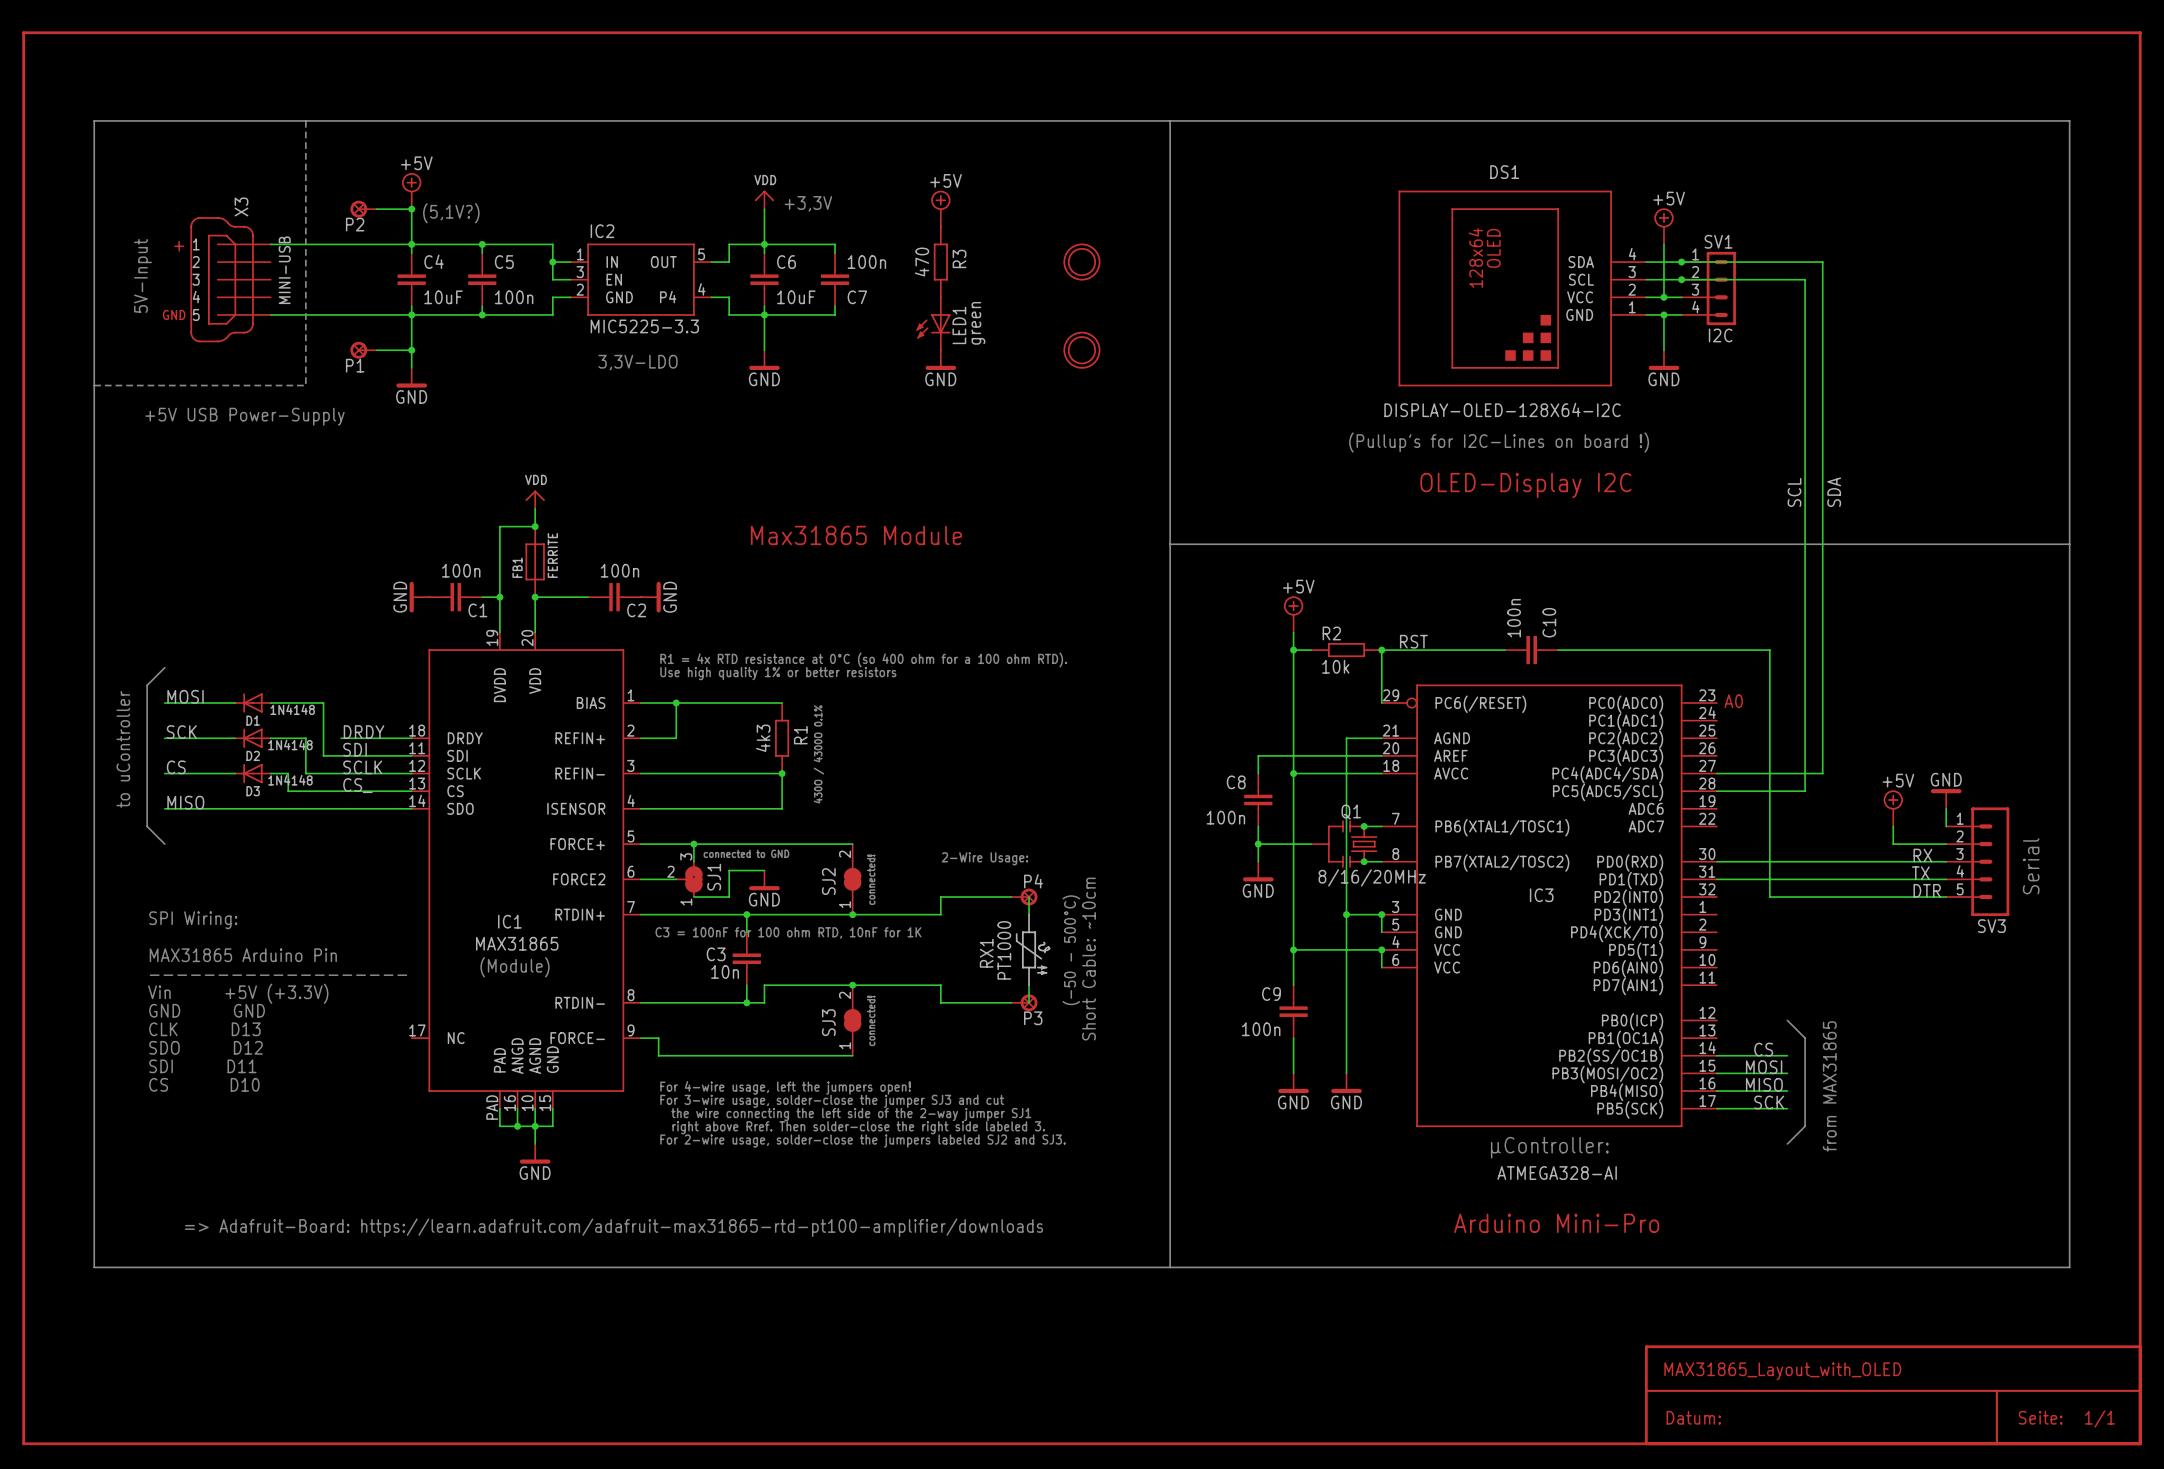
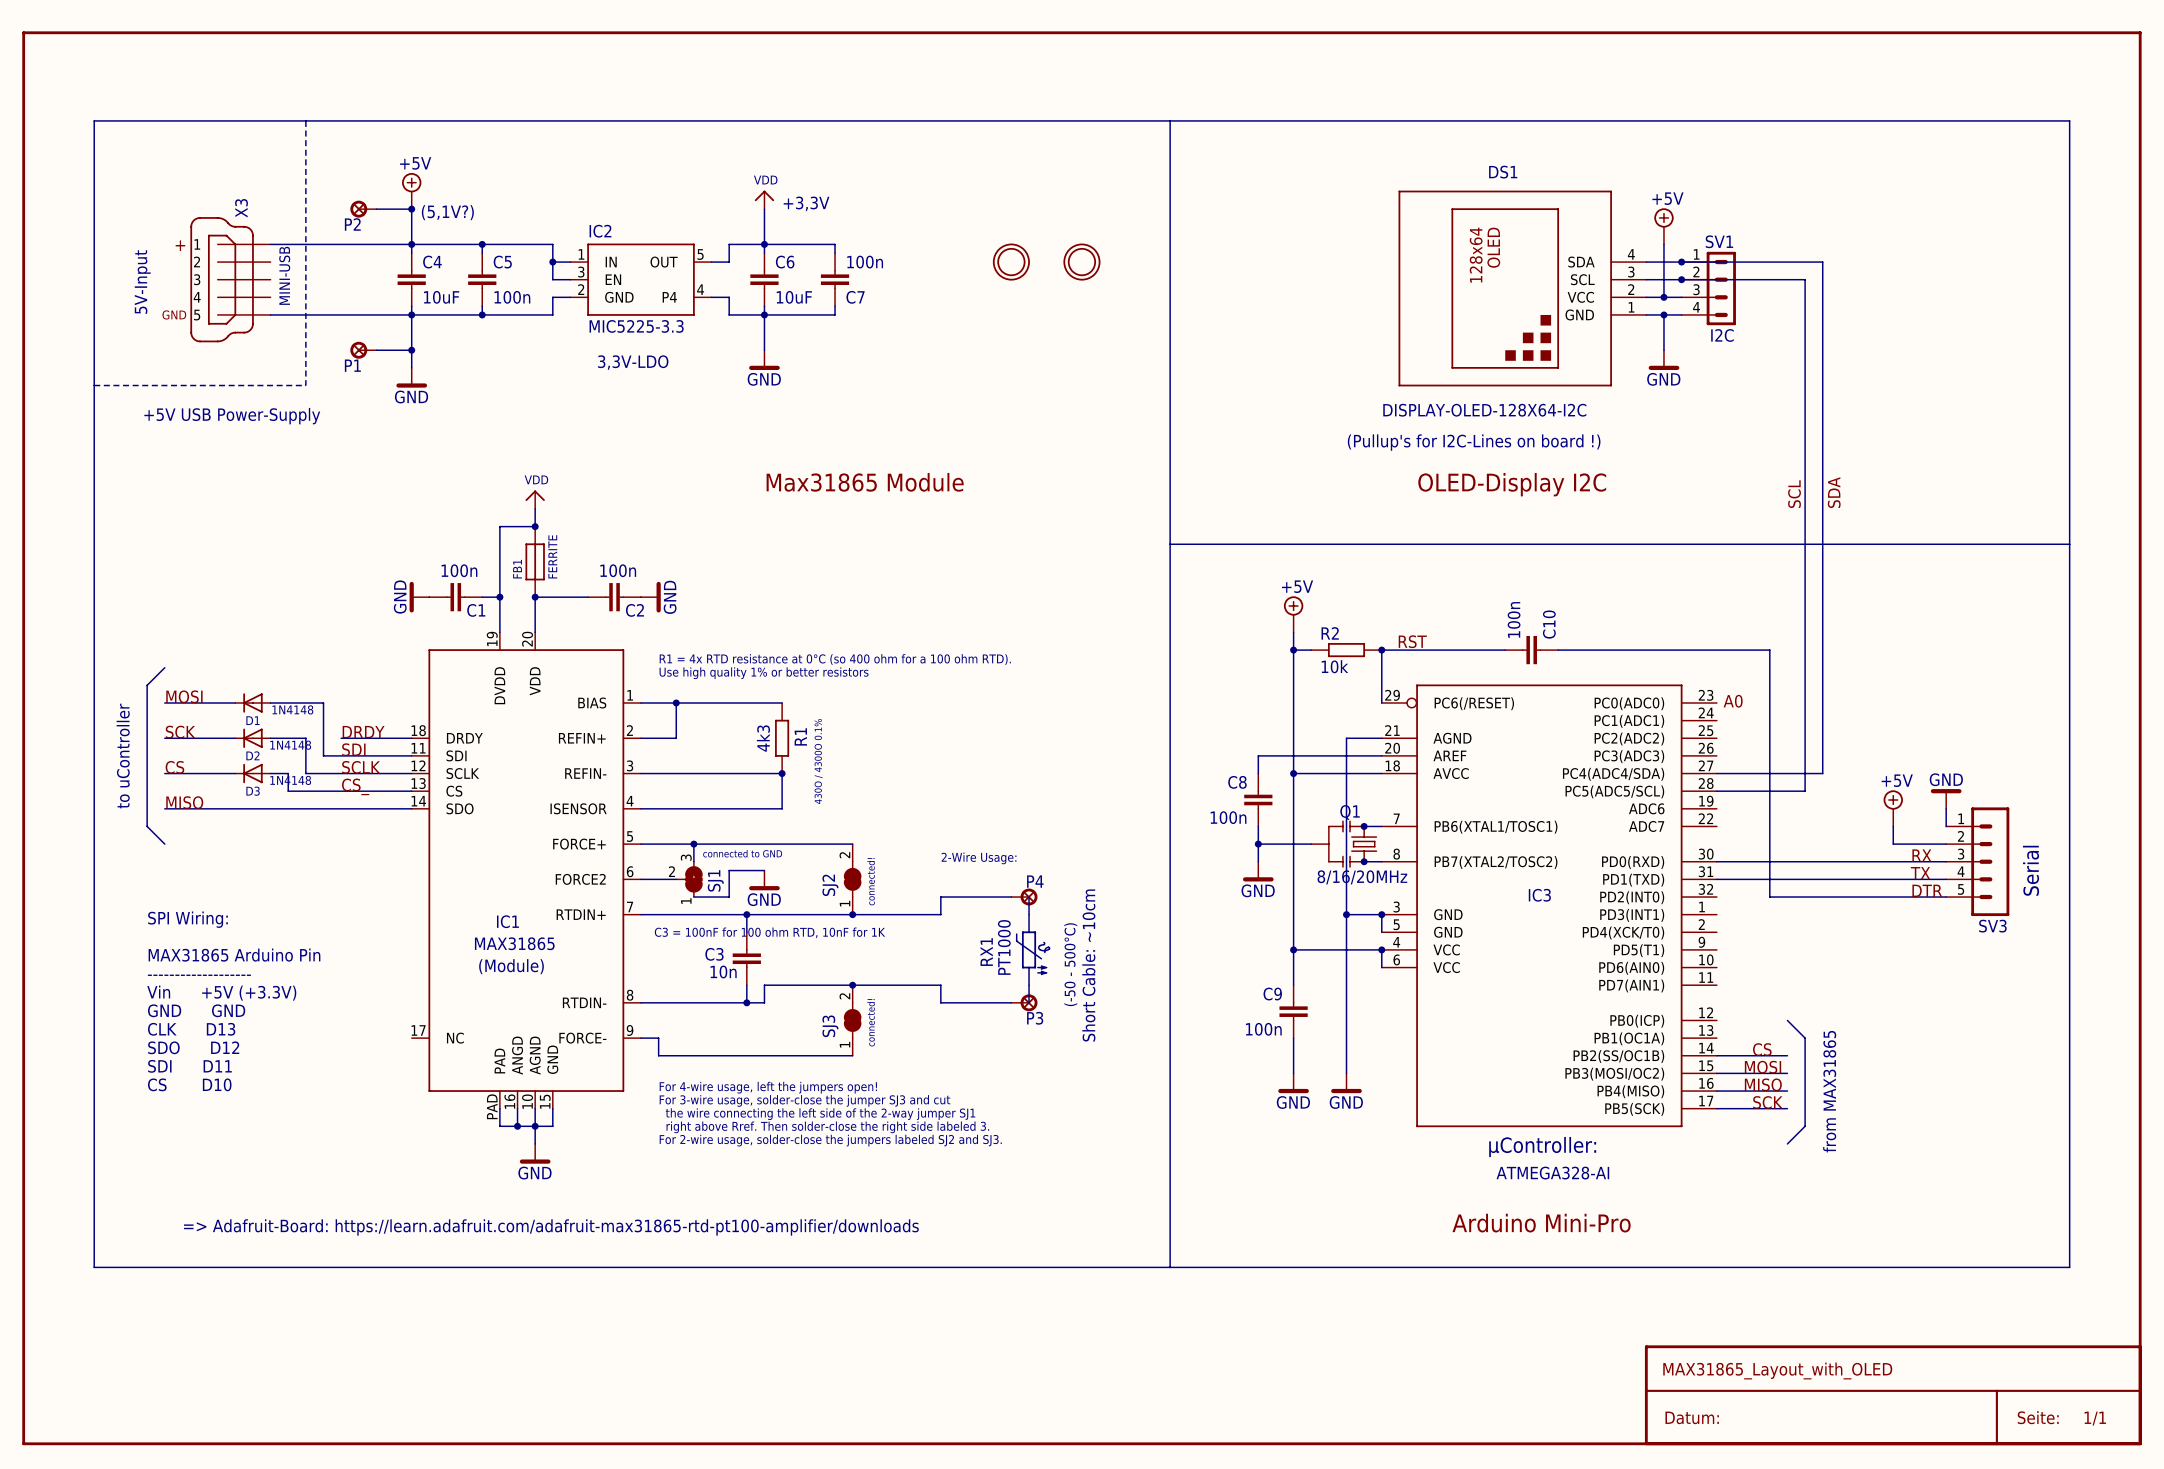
power symbol: +5V (940, 208) -> none
R3: 470 (940, 262) -> none
LED1: green (933, 323) -> none
part position: (1081, 350) -> (1011, 262)
power symbol: GND (940, 360) -> none
text position: Max31865 Module (856, 535) -> Max31865 Module (865, 482)

